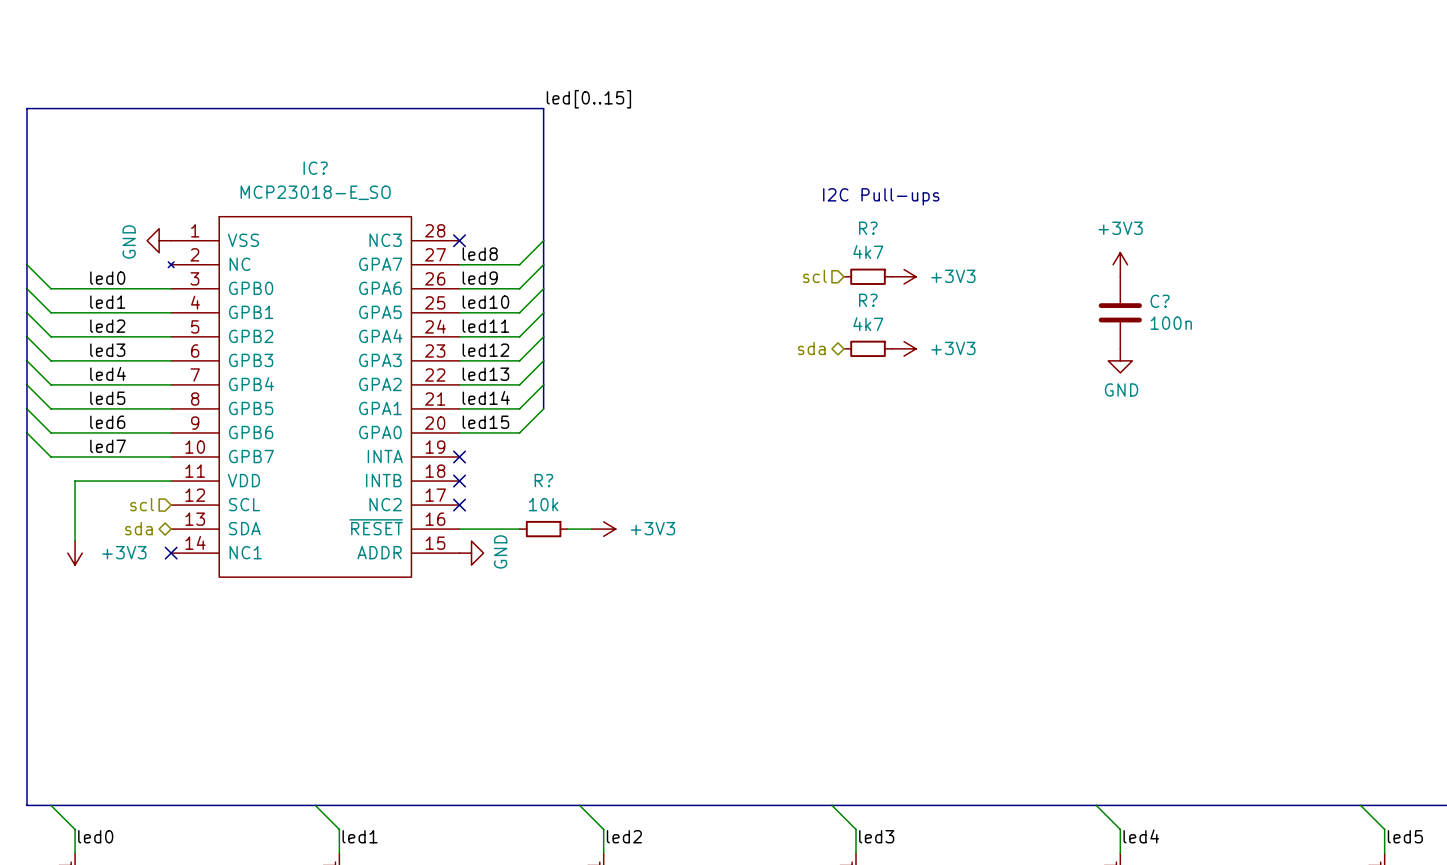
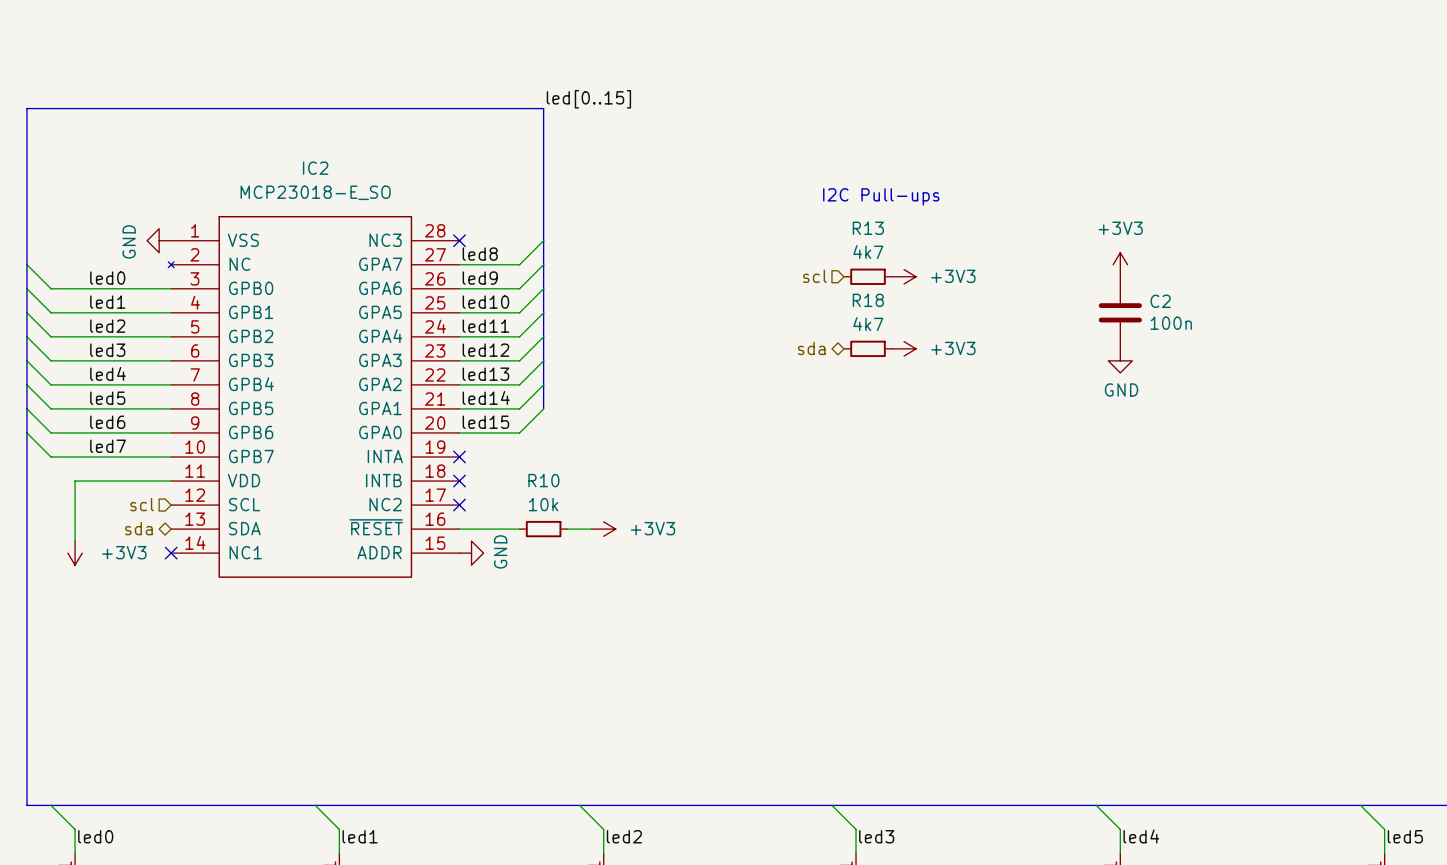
IC? name: IC? (315, 168) -> IC2 (315, 168)
R? name: R? (868, 228) -> R13 (868, 228)
R? name: R? (868, 300) -> R18 (868, 300)
C? name: C? (1160, 301) -> C2 (1160, 301)
R? name: R? (543, 480) -> R10 (543, 480)

